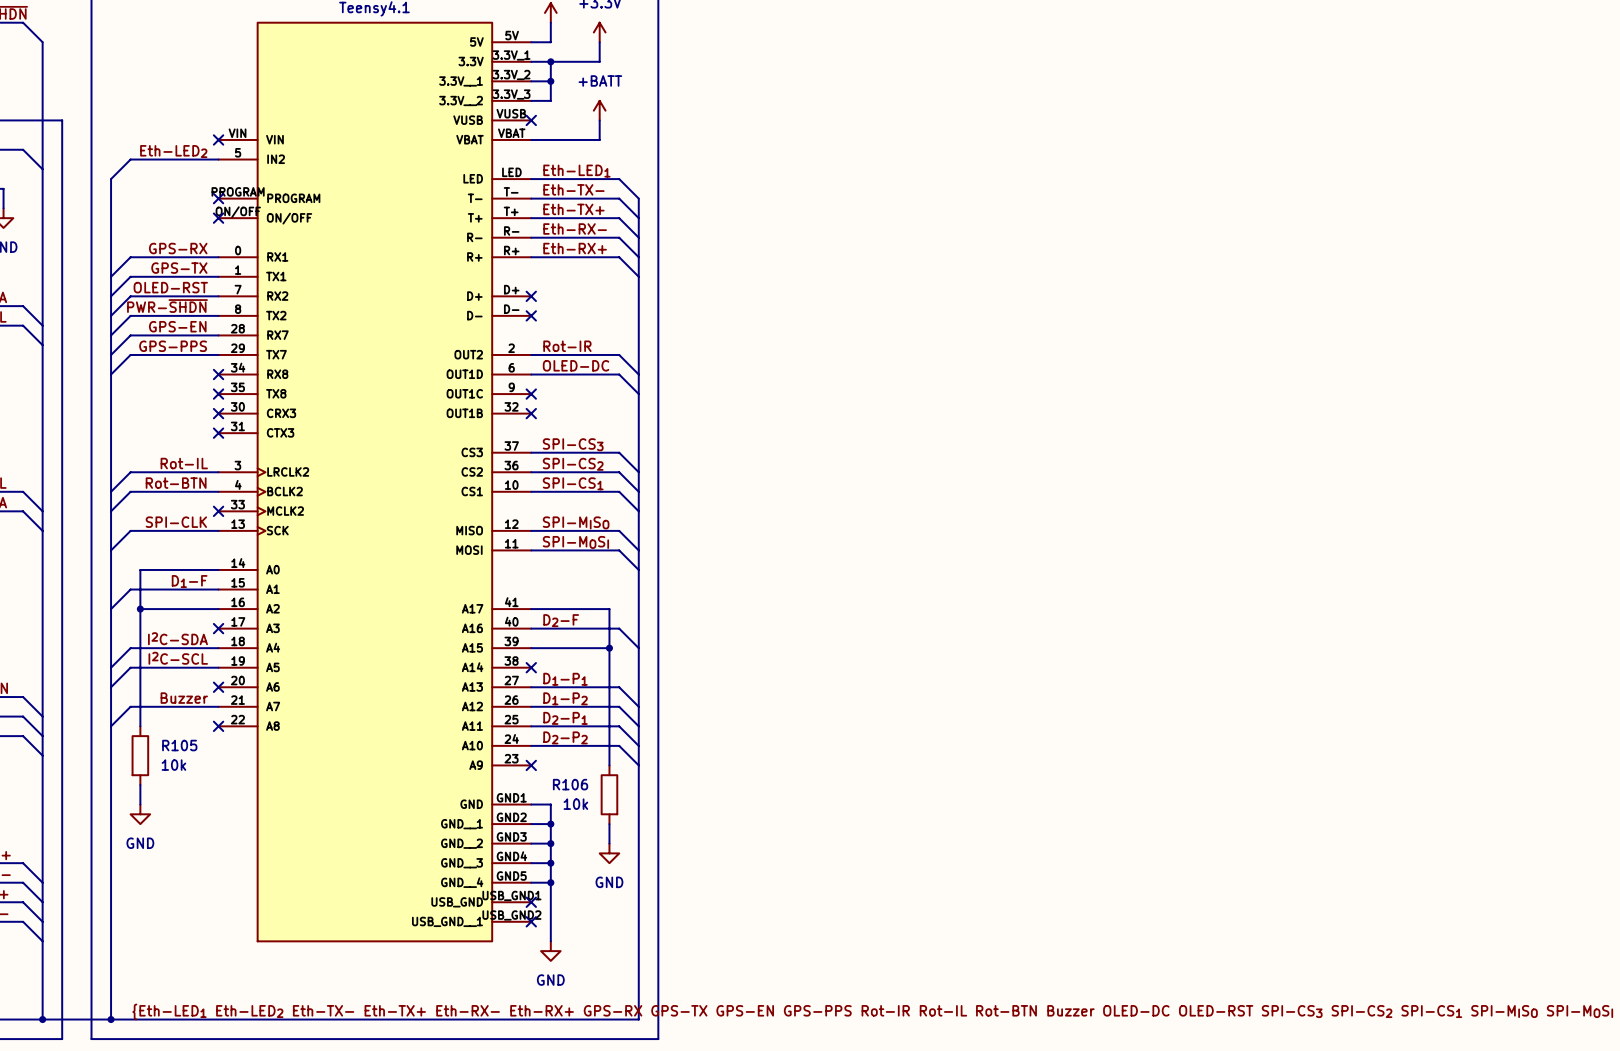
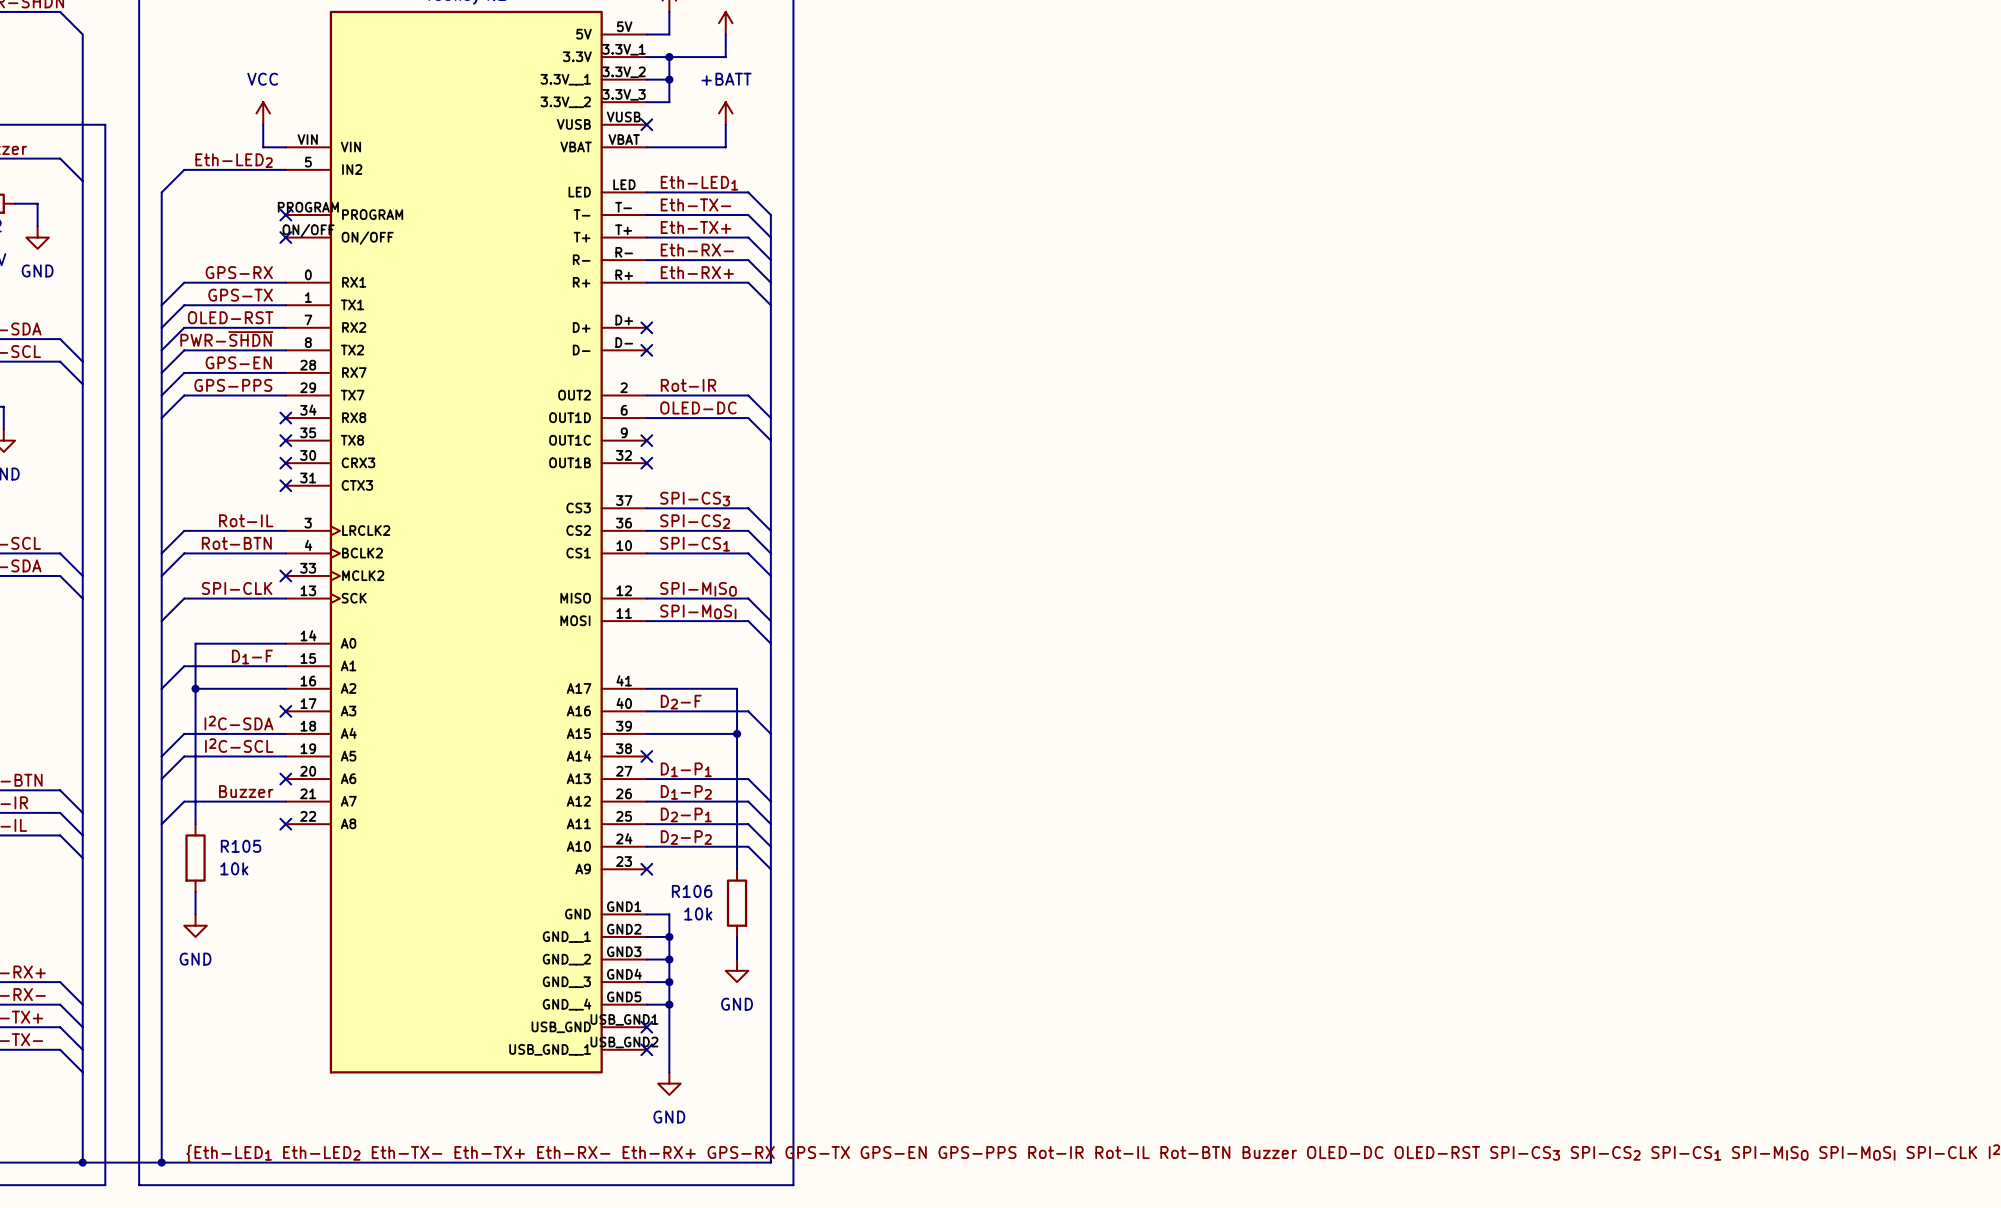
power symbol: none -> VCC (263, 113)
wire: none -> (263, 124) (263, 147) (285, 147)
no-connect mark: (218, 139) -> none

